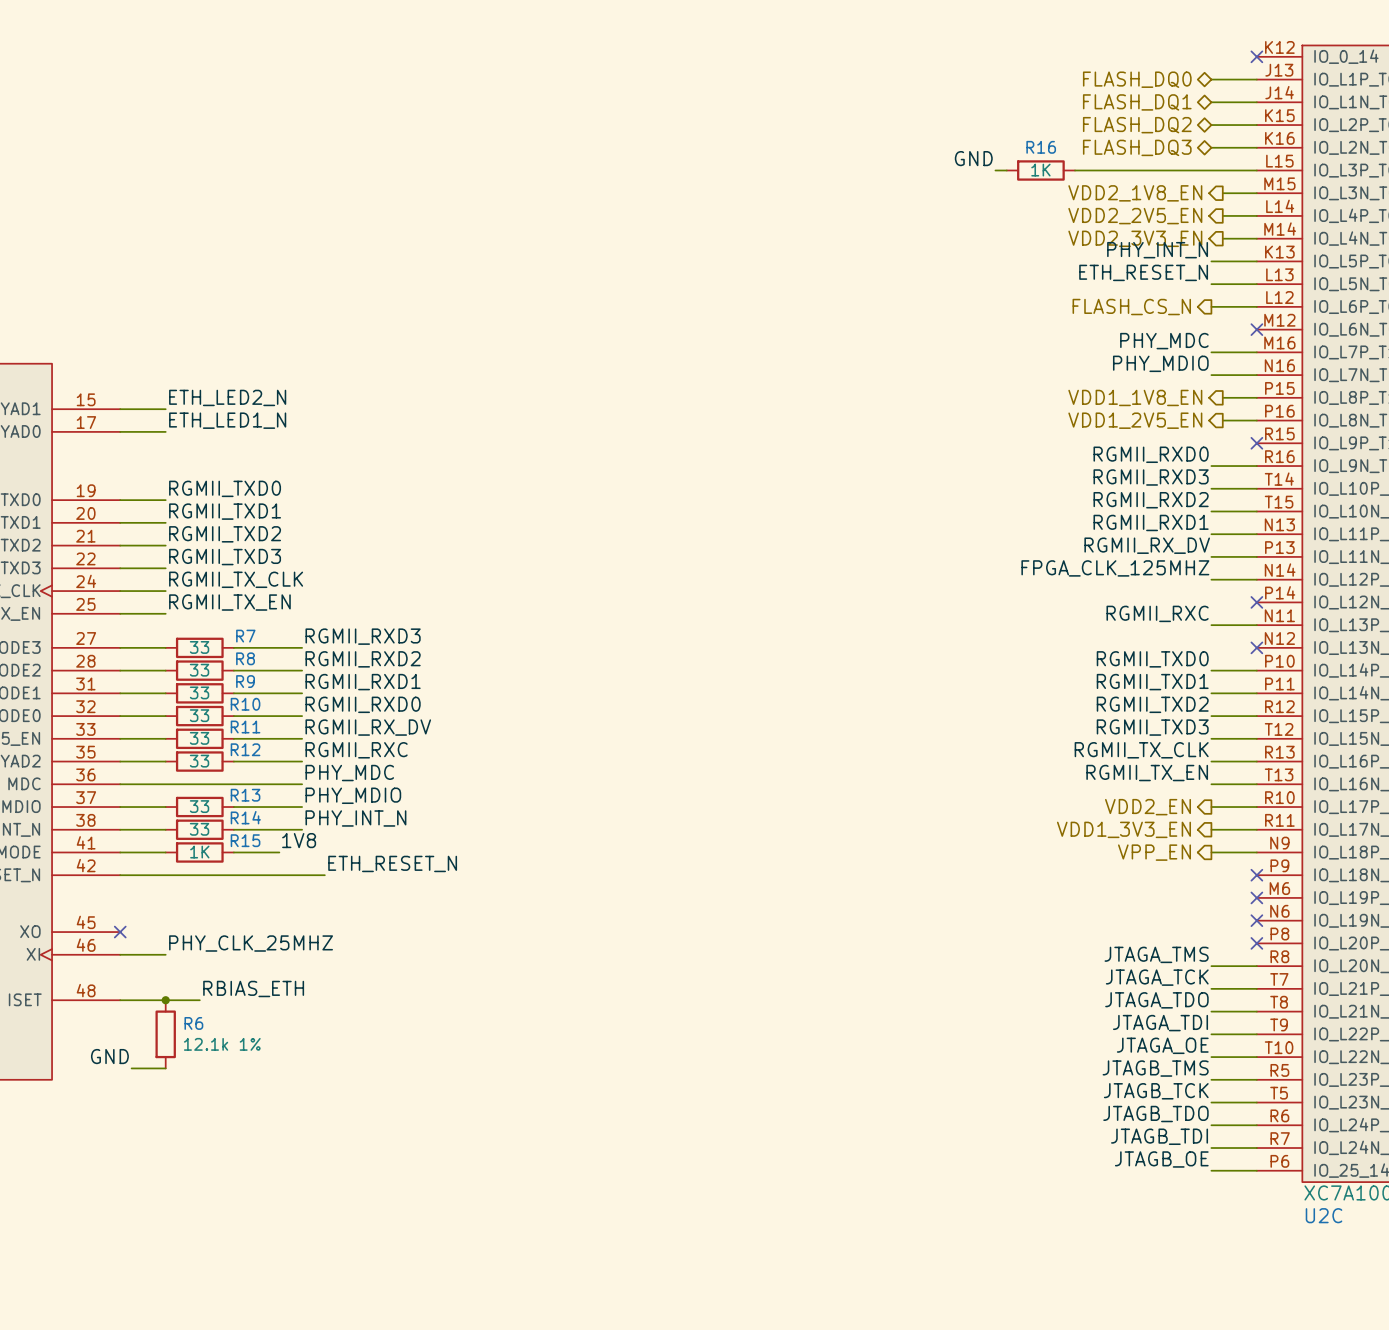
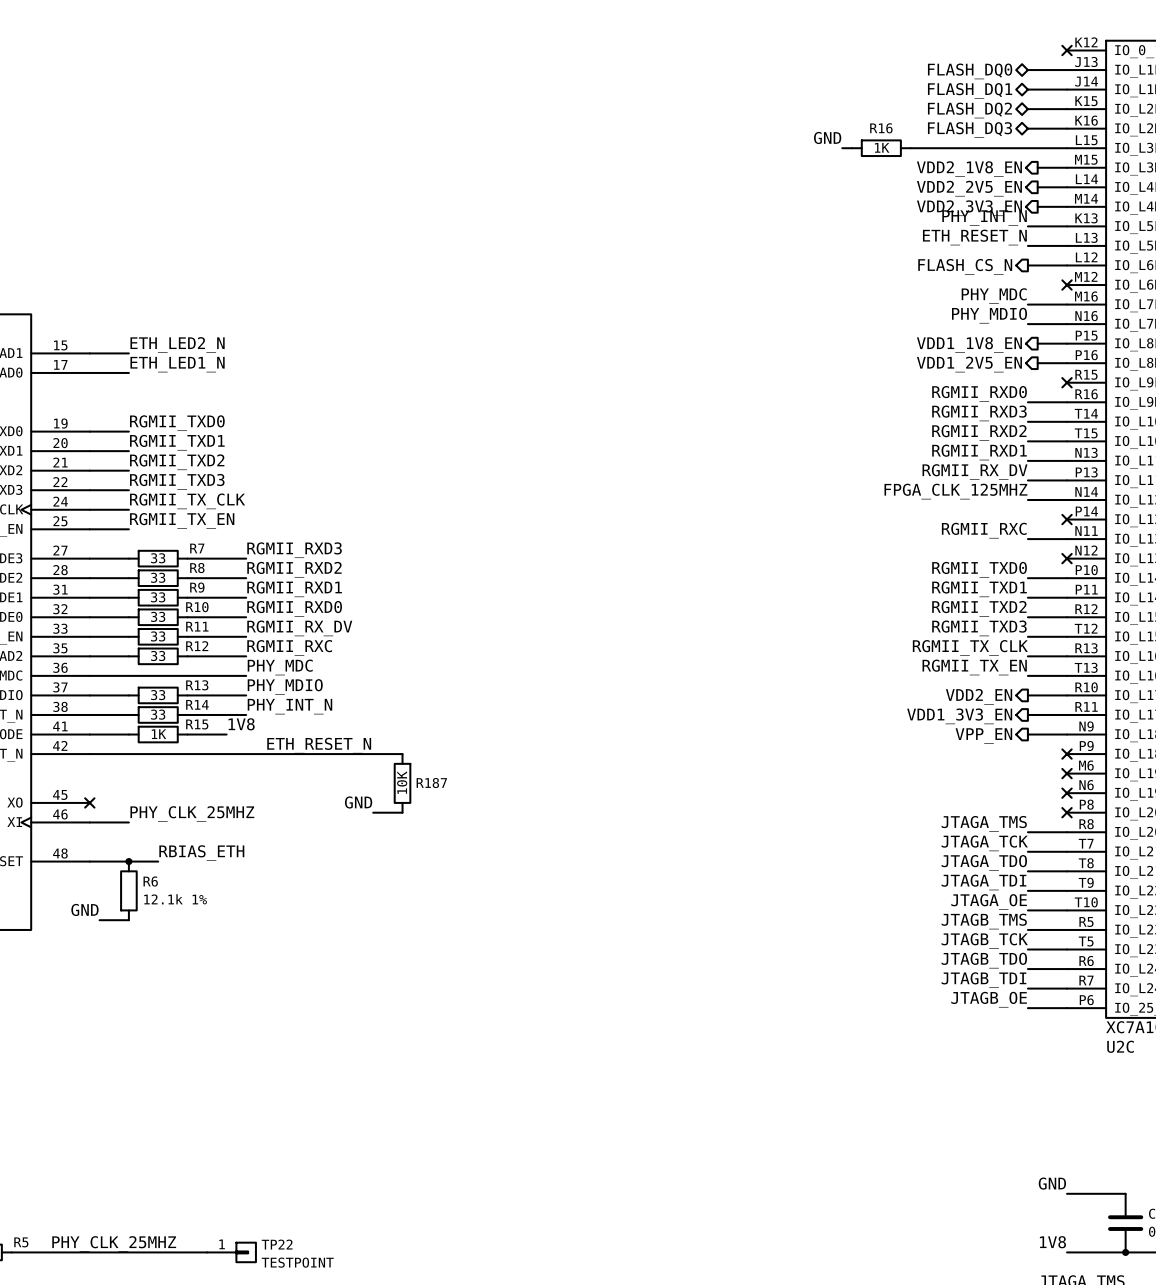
wire: none -> (265, 754) (402, 754)
R187: none -> 10K (402, 783)
label: none -> GND (358, 802)
wire: none -> (373, 812) (402, 812)

